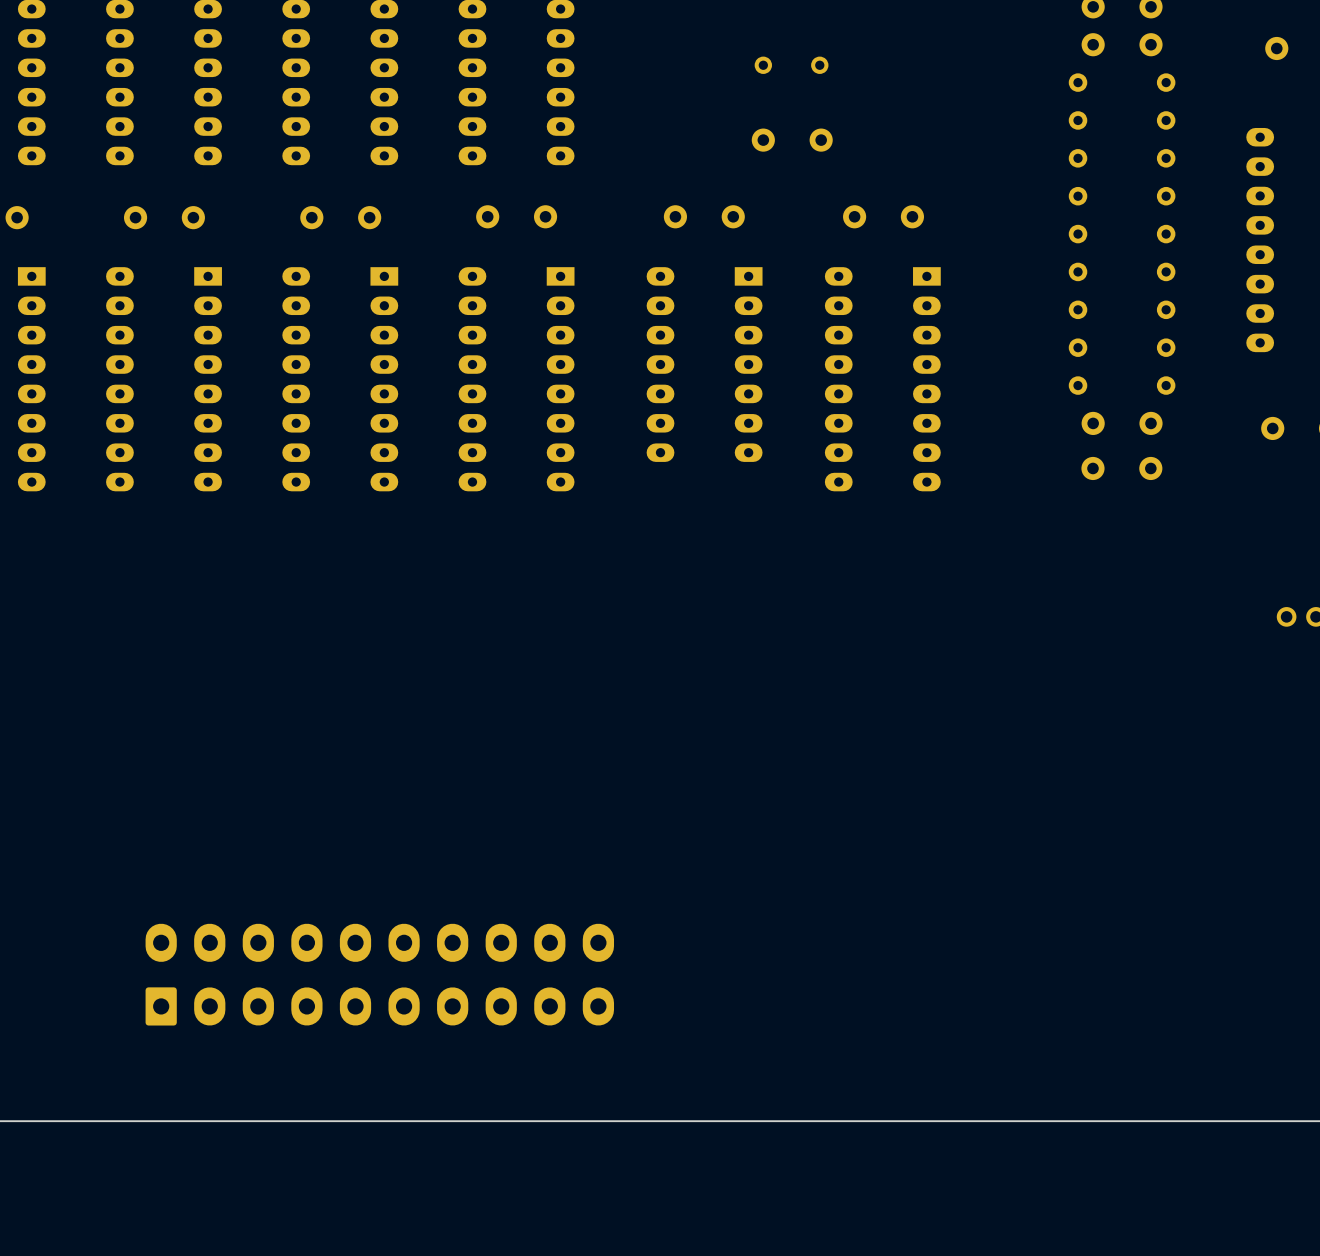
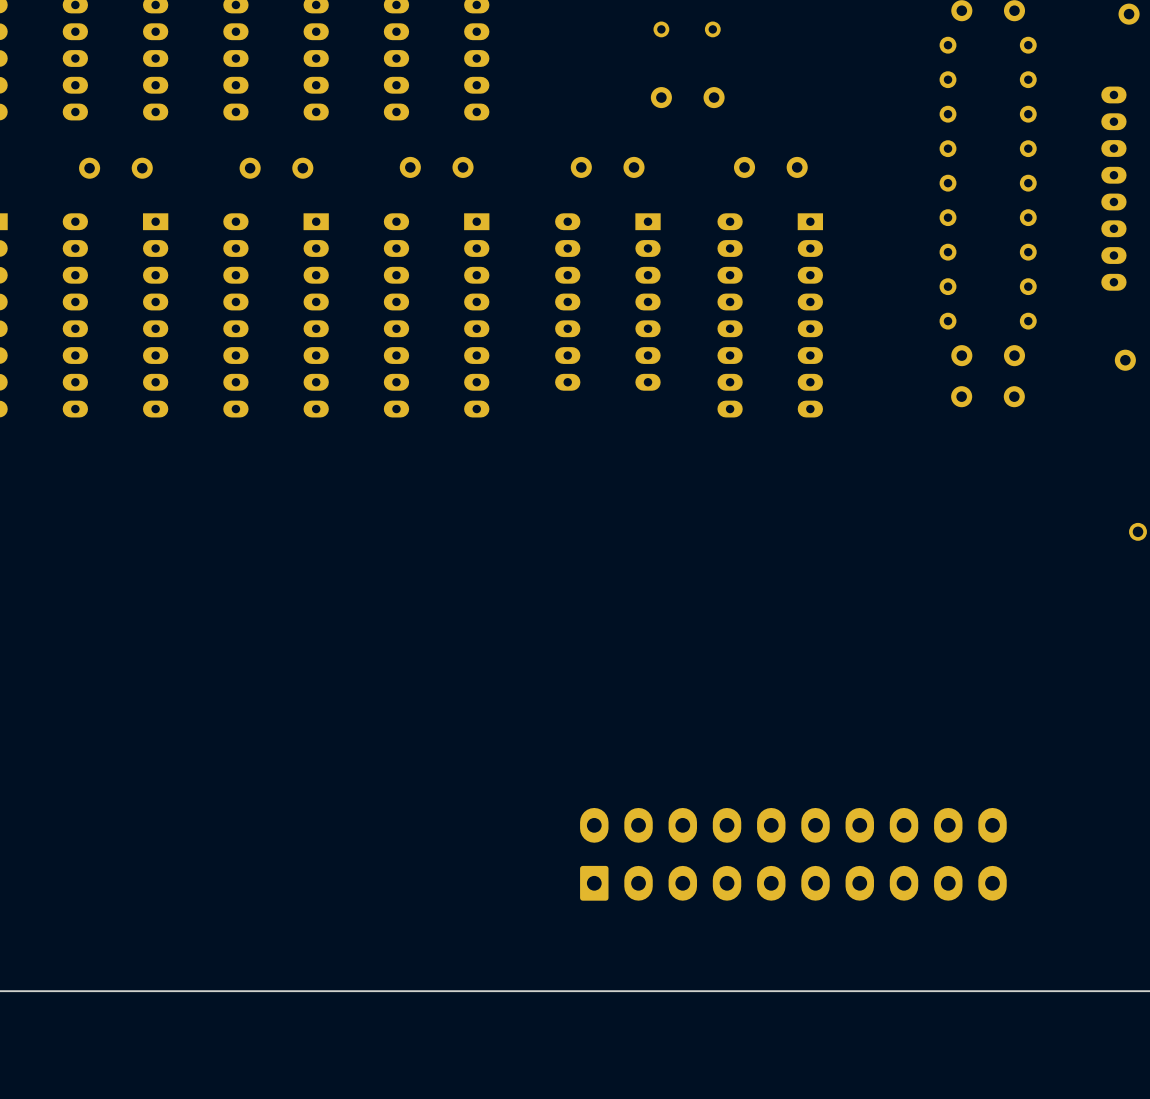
part: none -> (793, 854)
part: (379, 974) -> none

